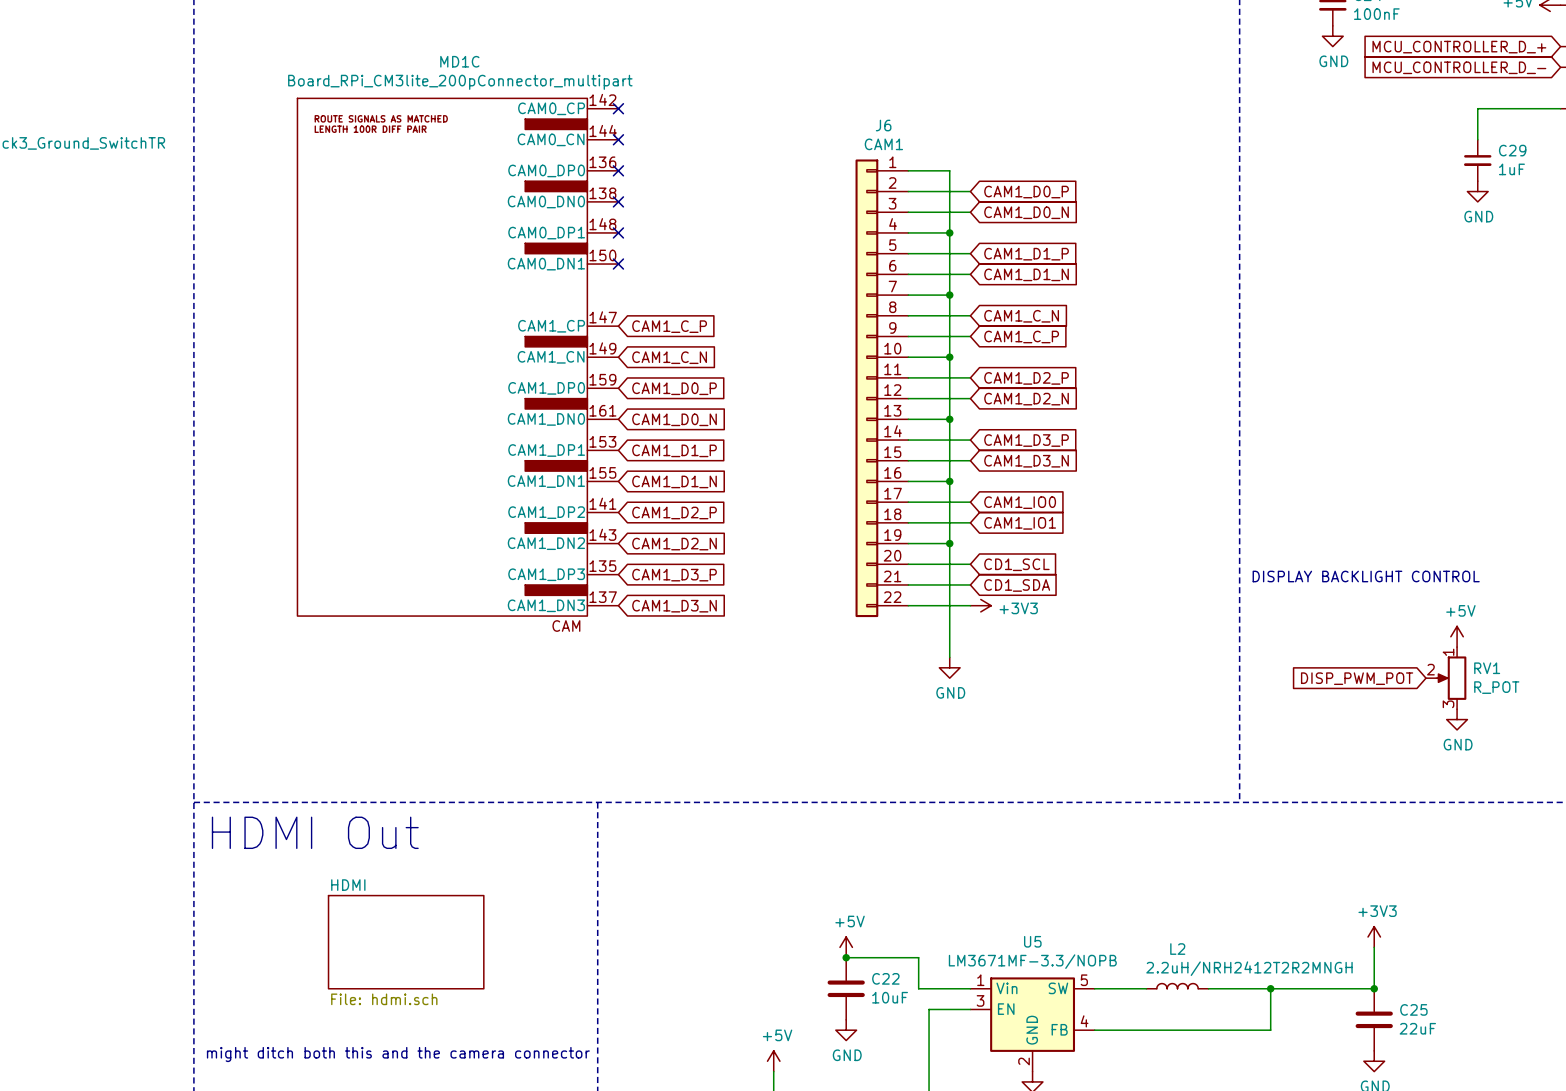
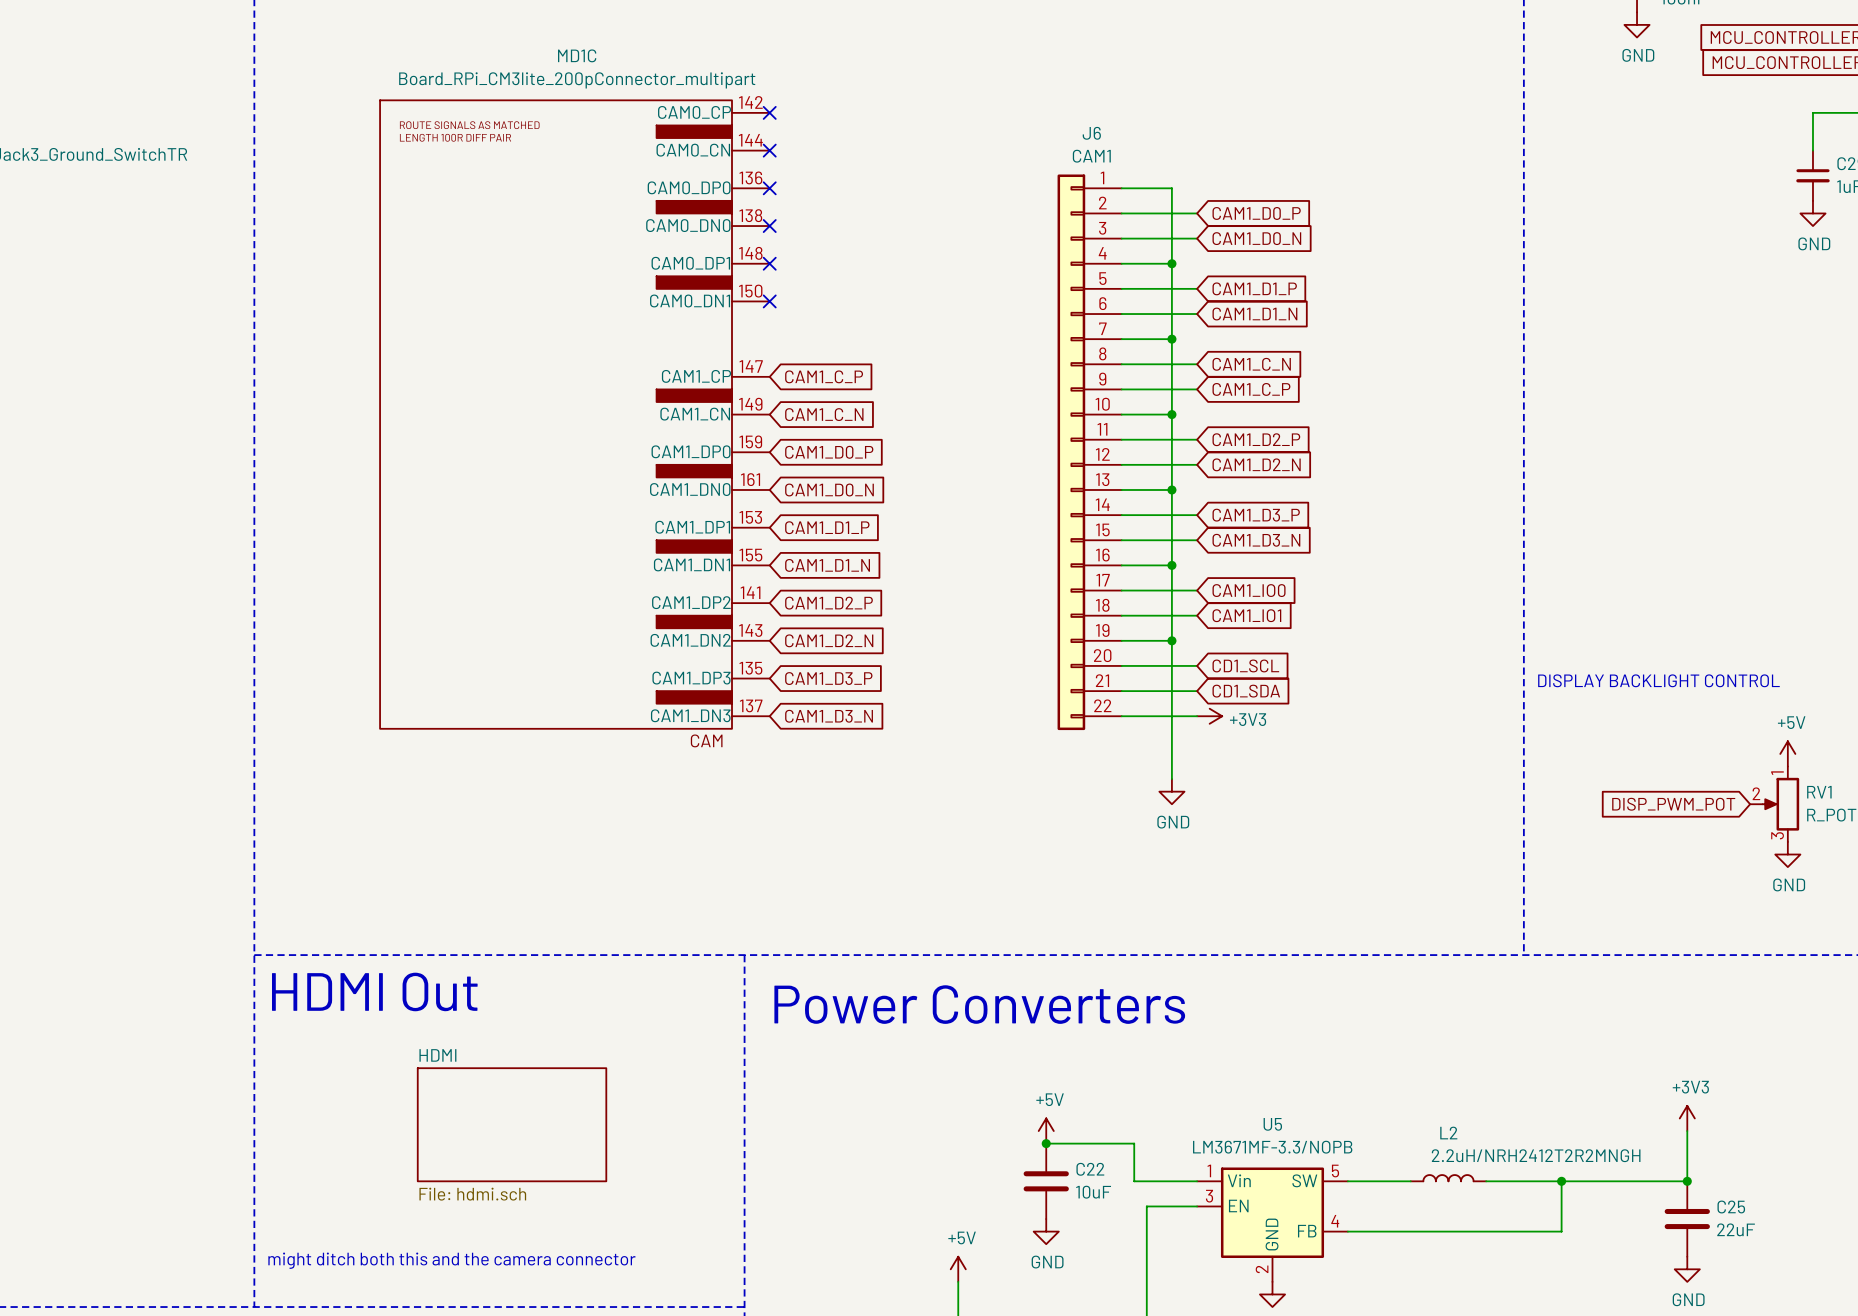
text: none -> Power Converters (979, 1004)

